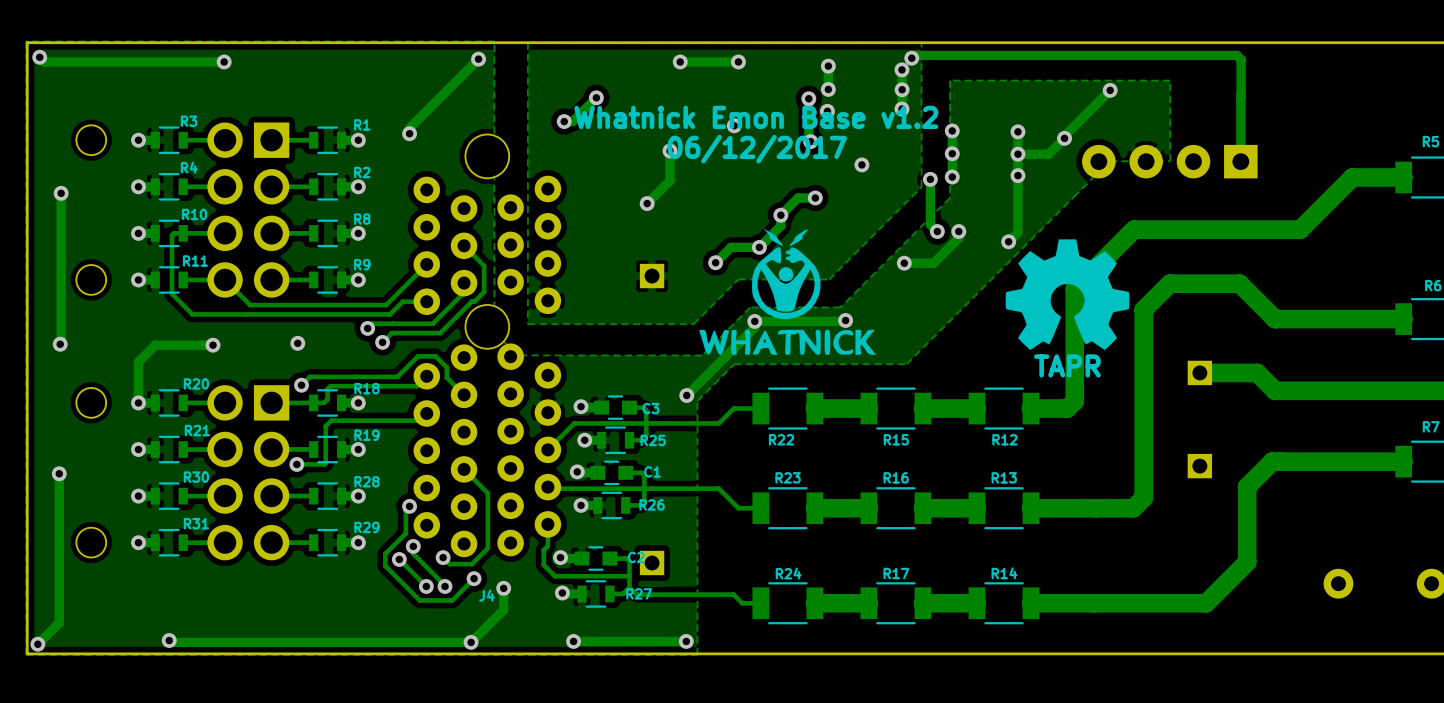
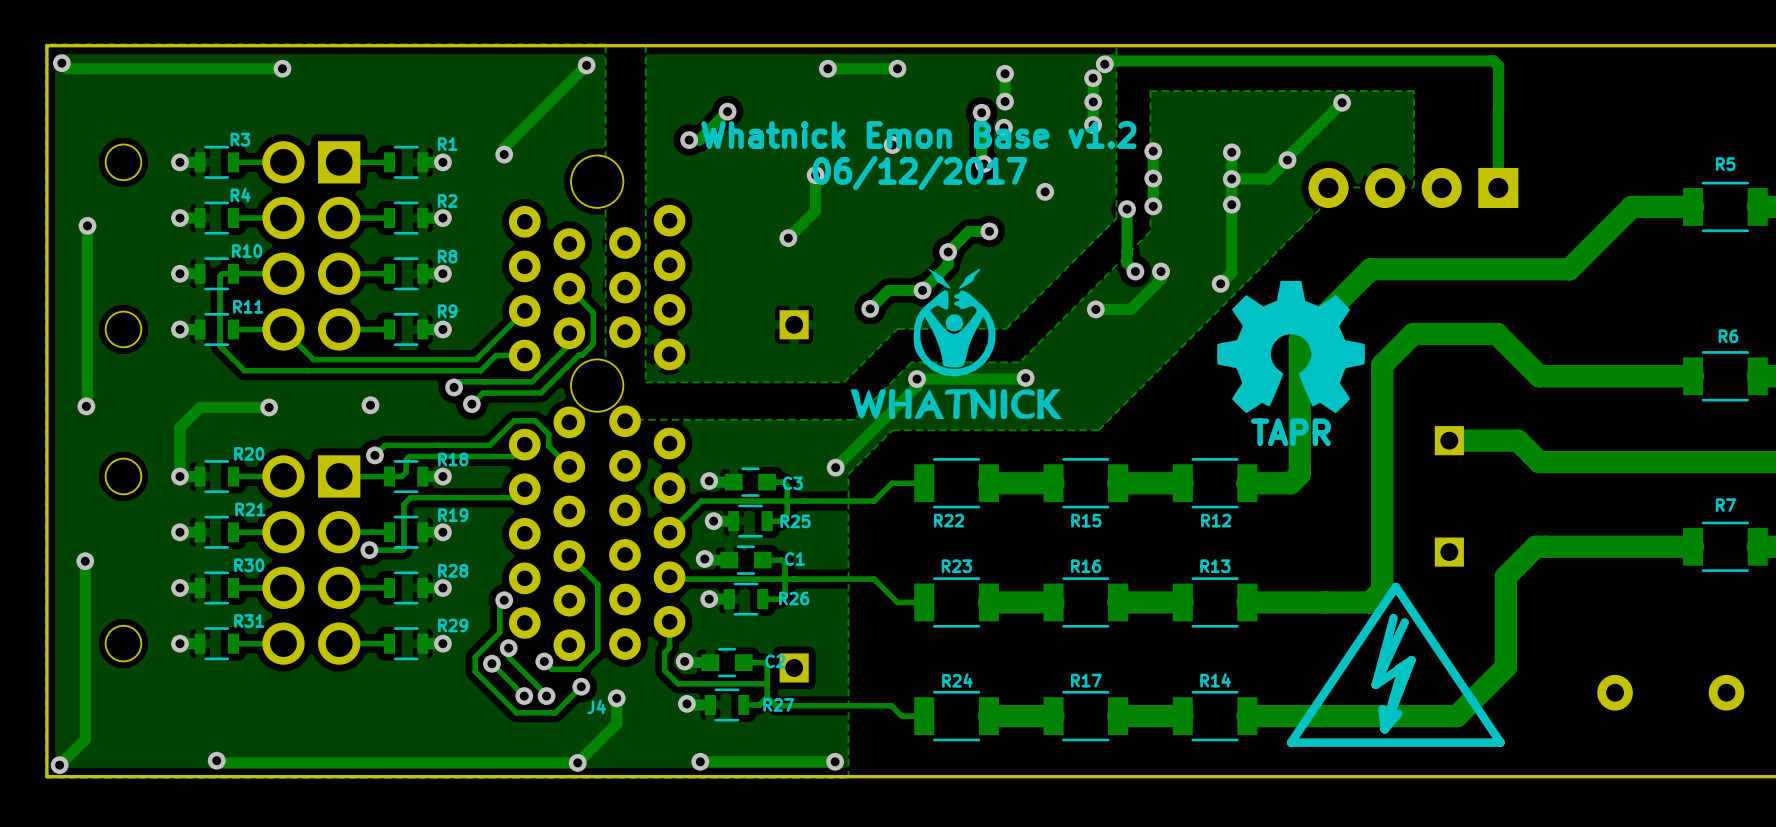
drawing: none -> [1286, 582, 1505, 747]

